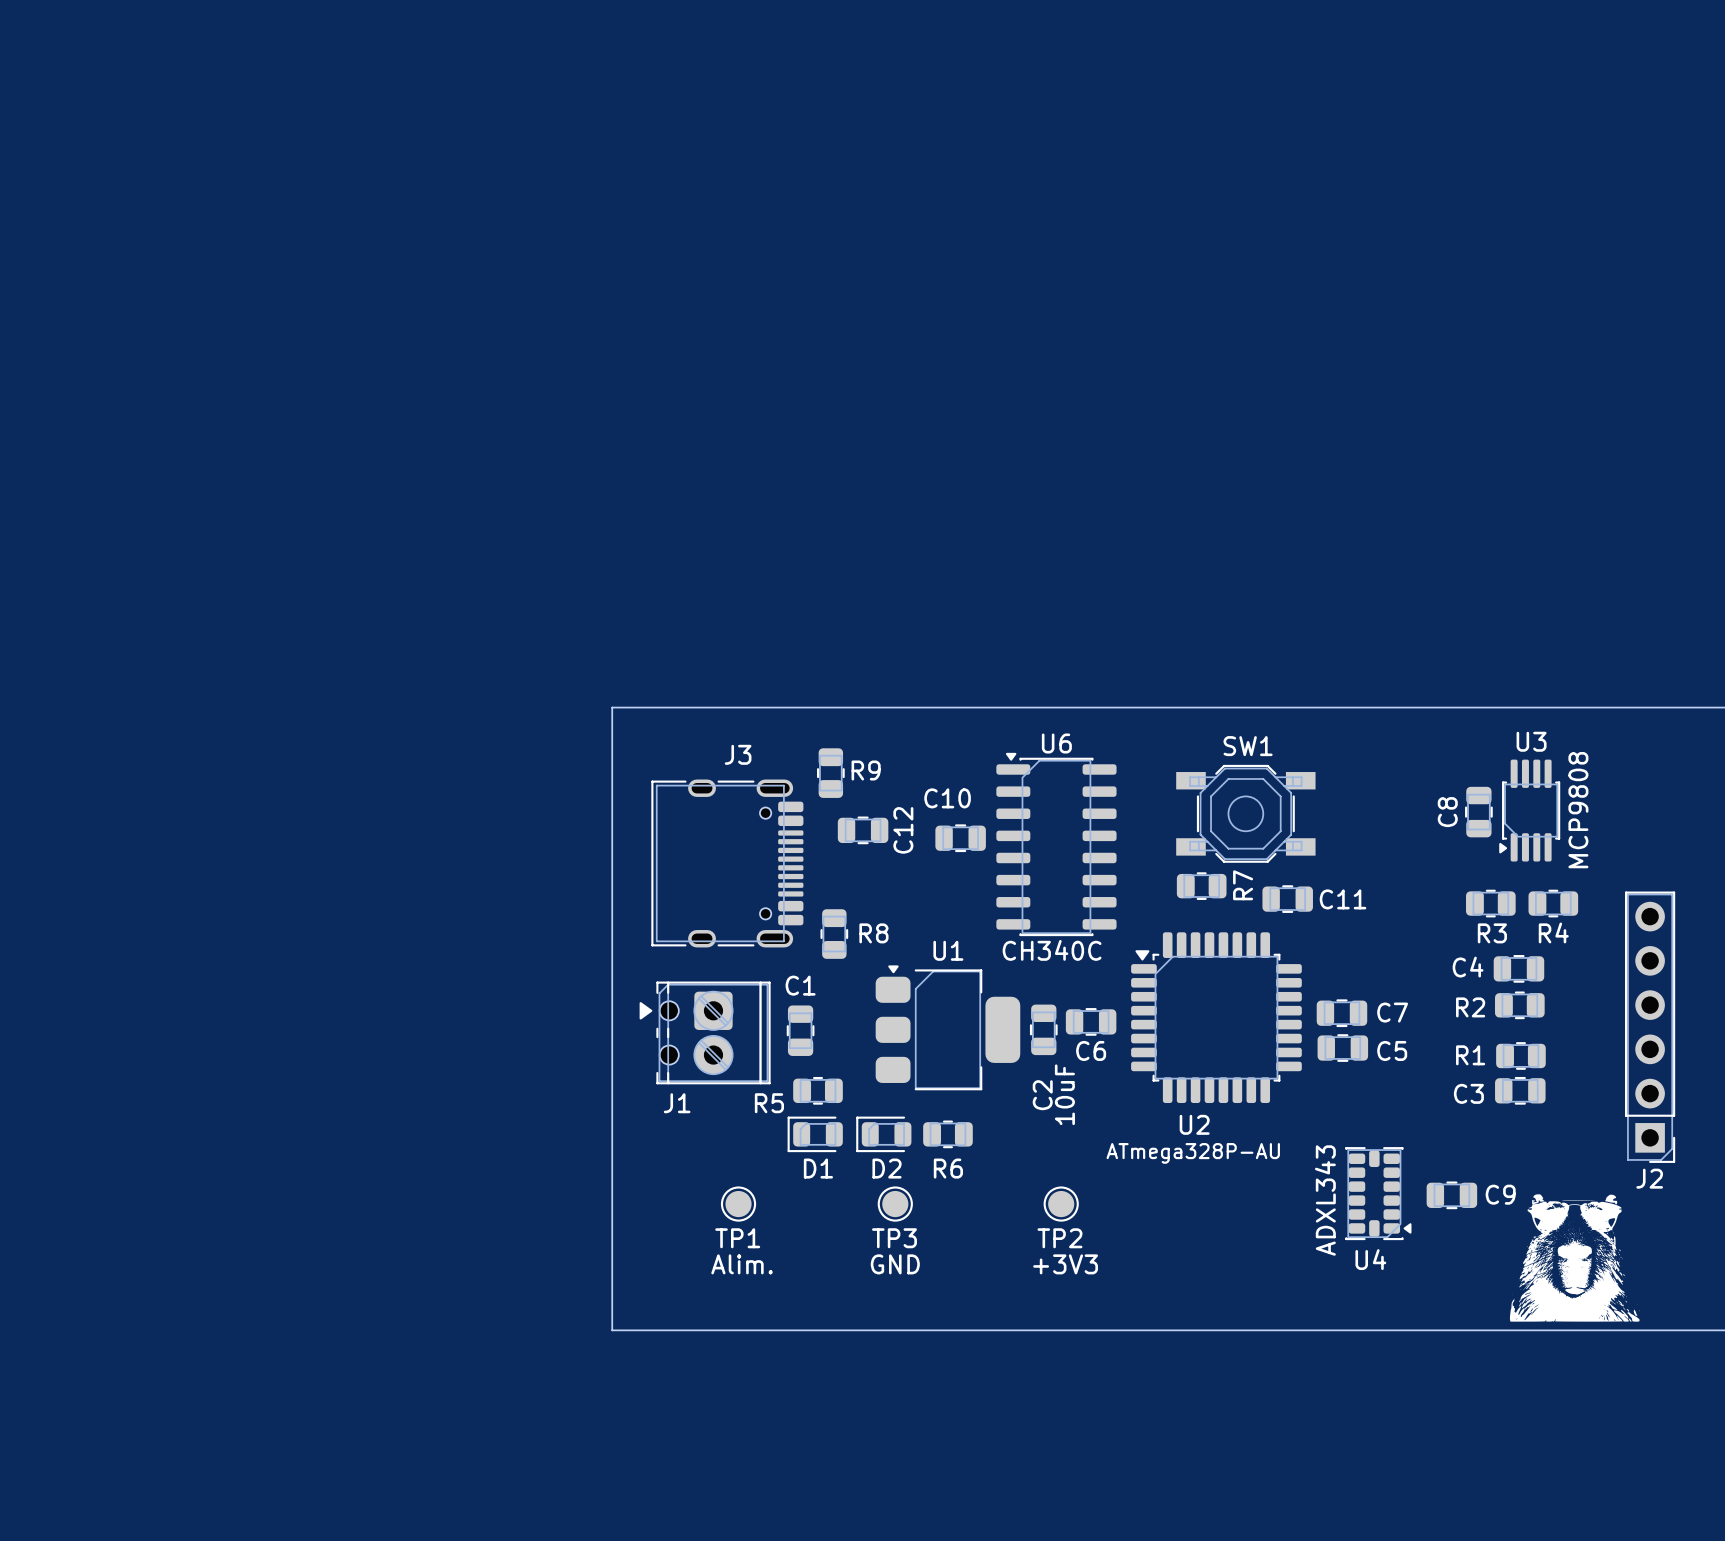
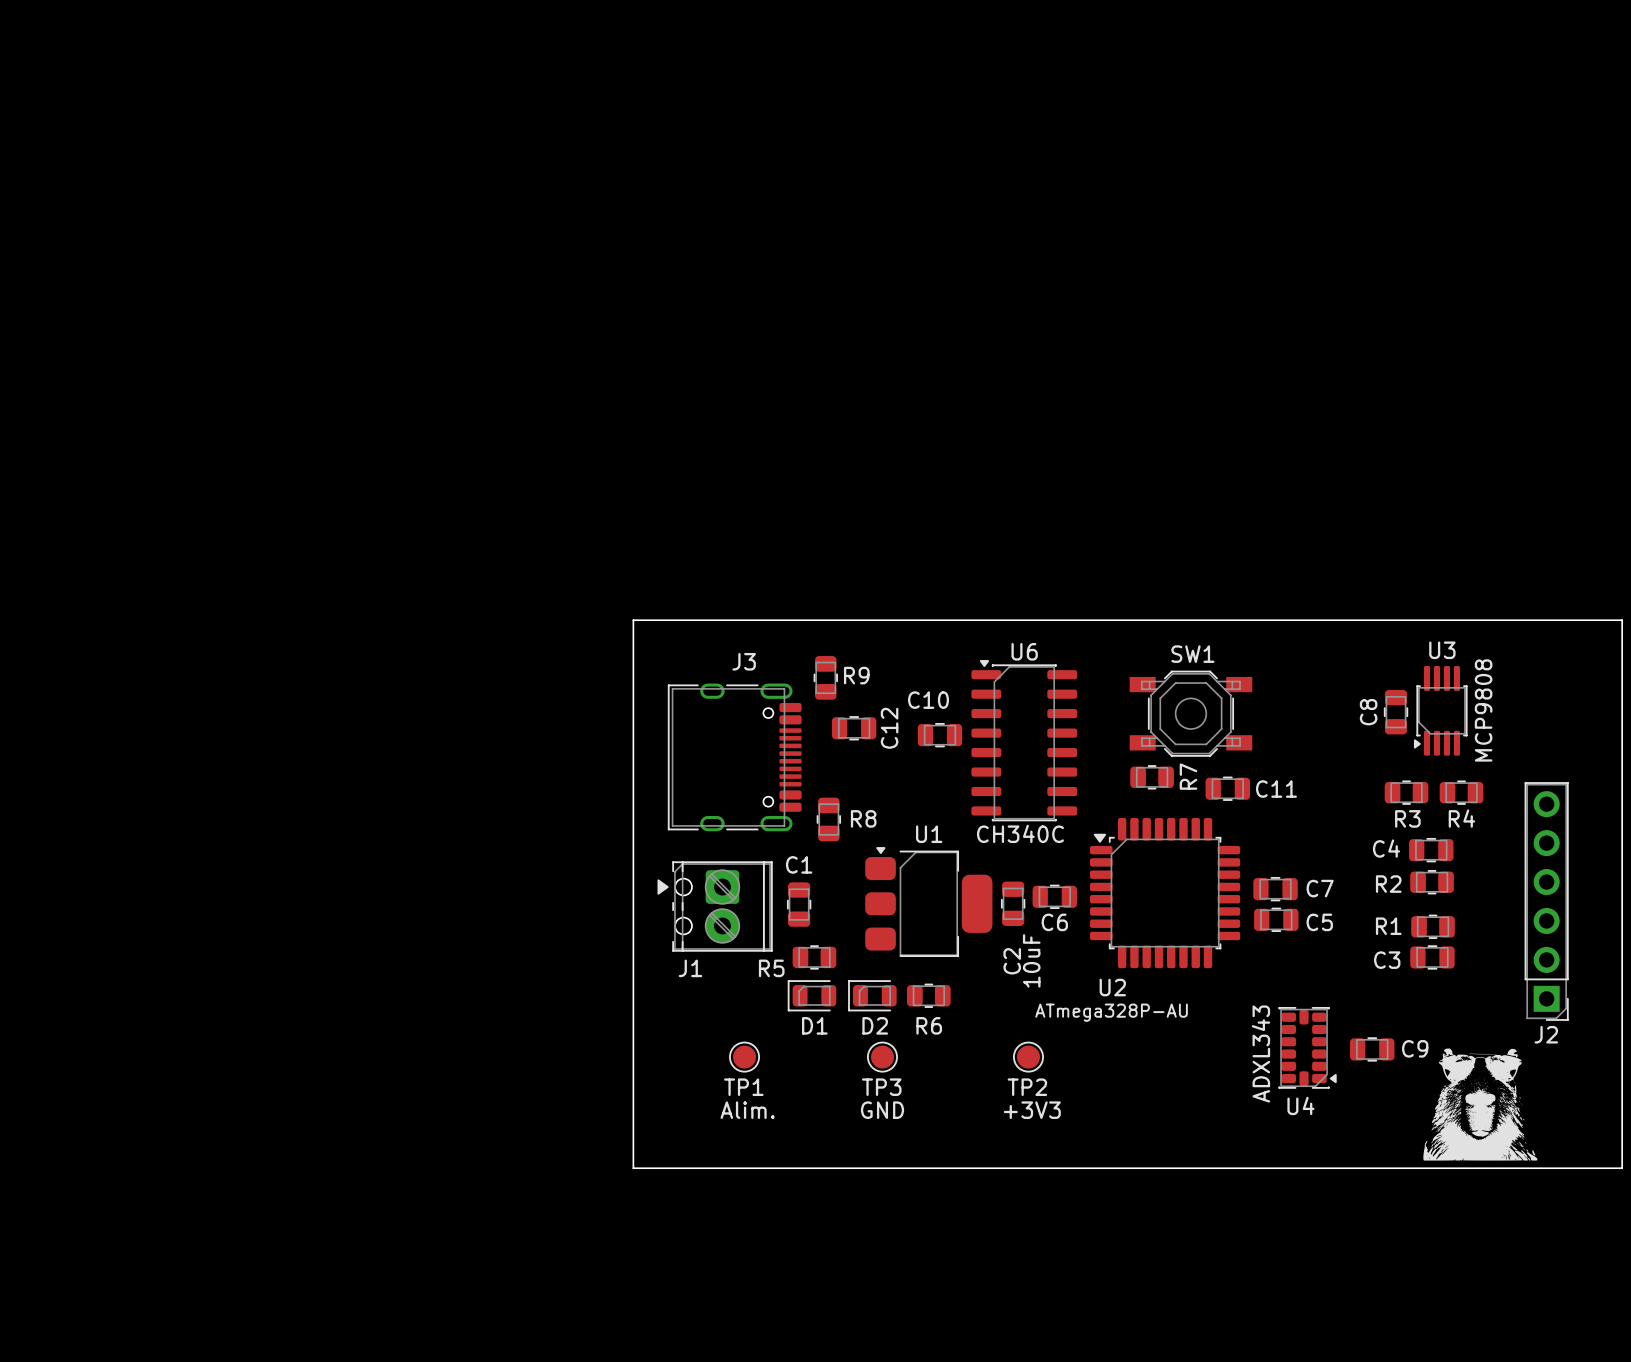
U2 name position: U2 (1194, 1124) -> U2 (1112, 987)
U2 value position: ATmega328P-AU (1193, 1153) -> ATmega328P-AU (1111, 1012)

